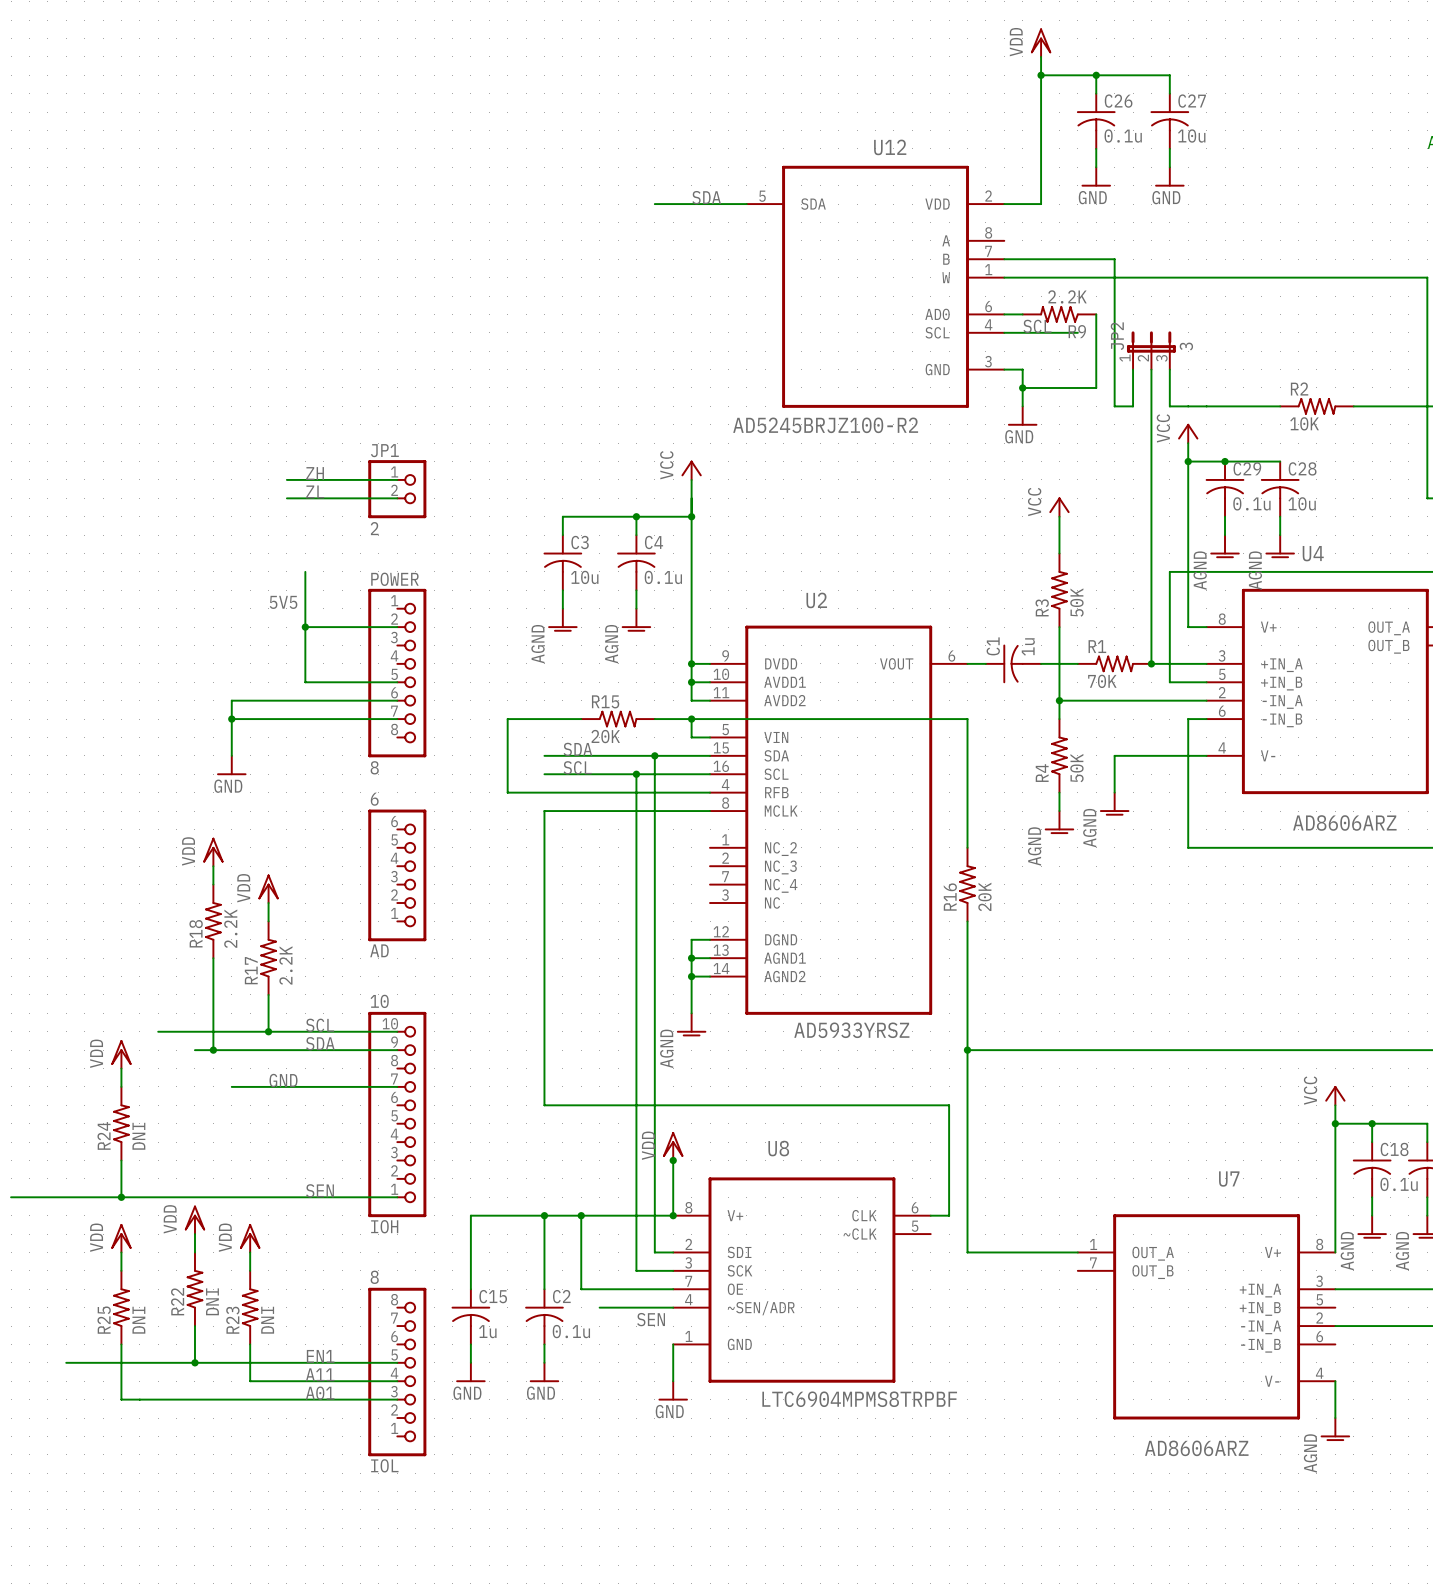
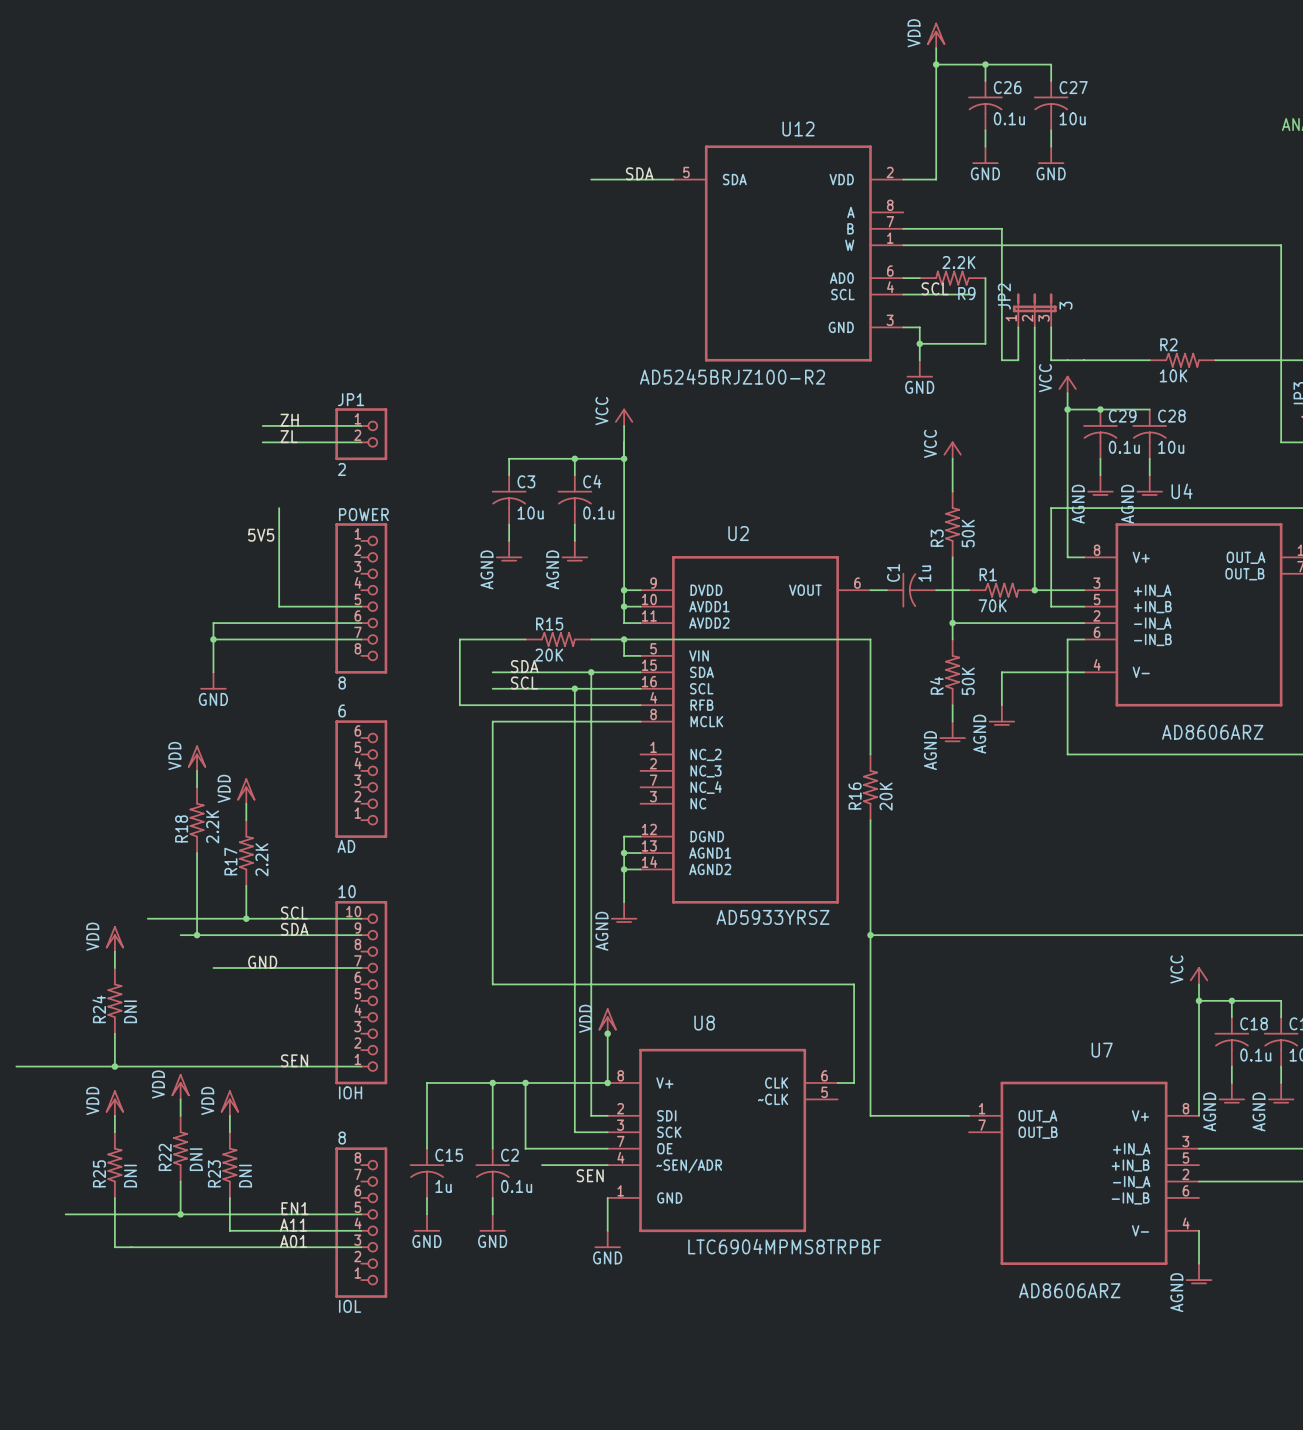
wire: (305, 627) (397, 627) -> none
junction: (305, 627) -> none

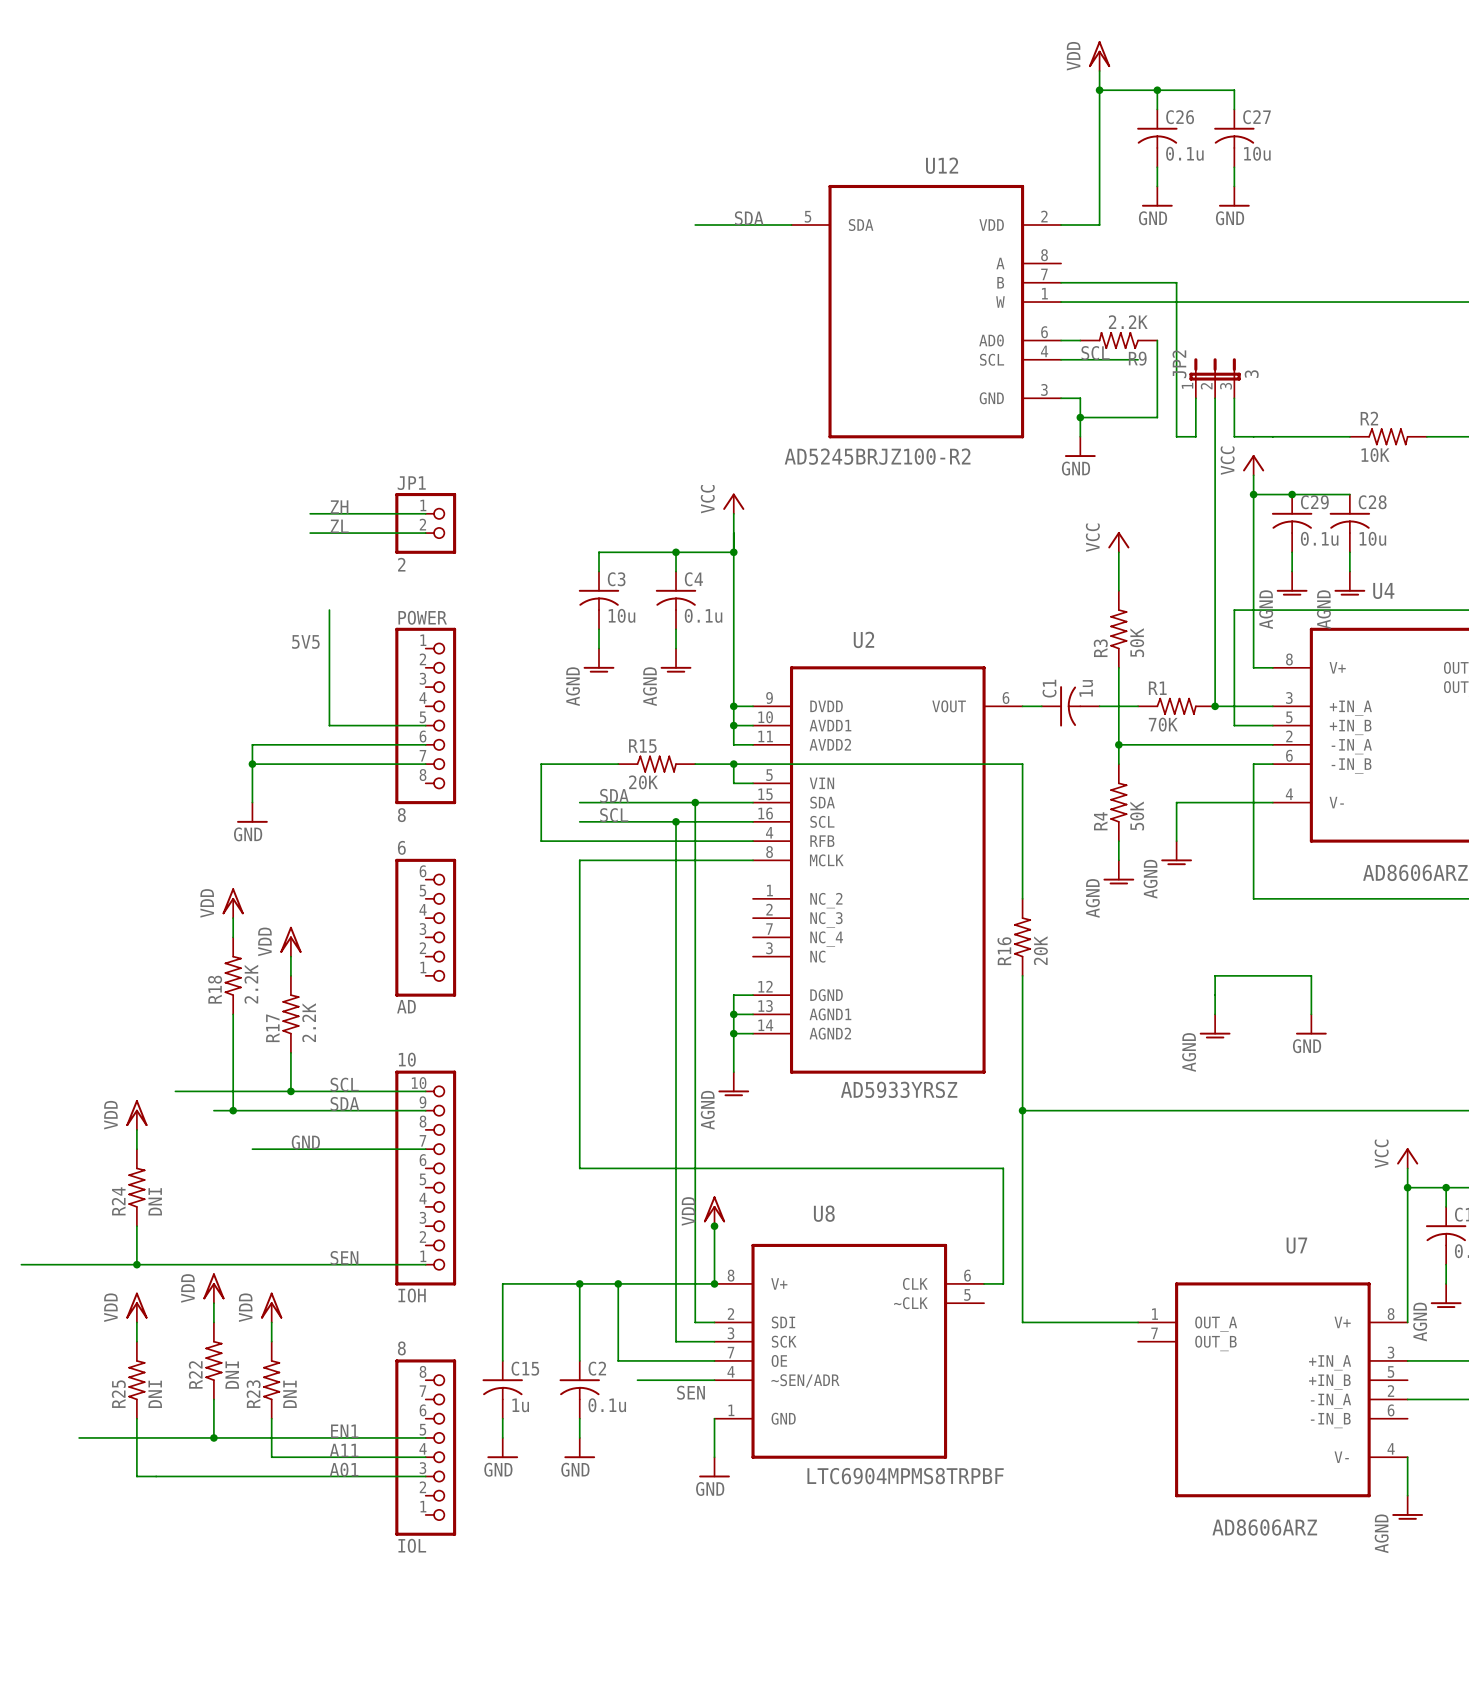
wire: none -> (1215, 1014) (1215, 975) (1311, 975) (1311, 1014)
power symbol: none -> GND (1311, 1024)
power symbol: none -> AGND (1215, 1026)

